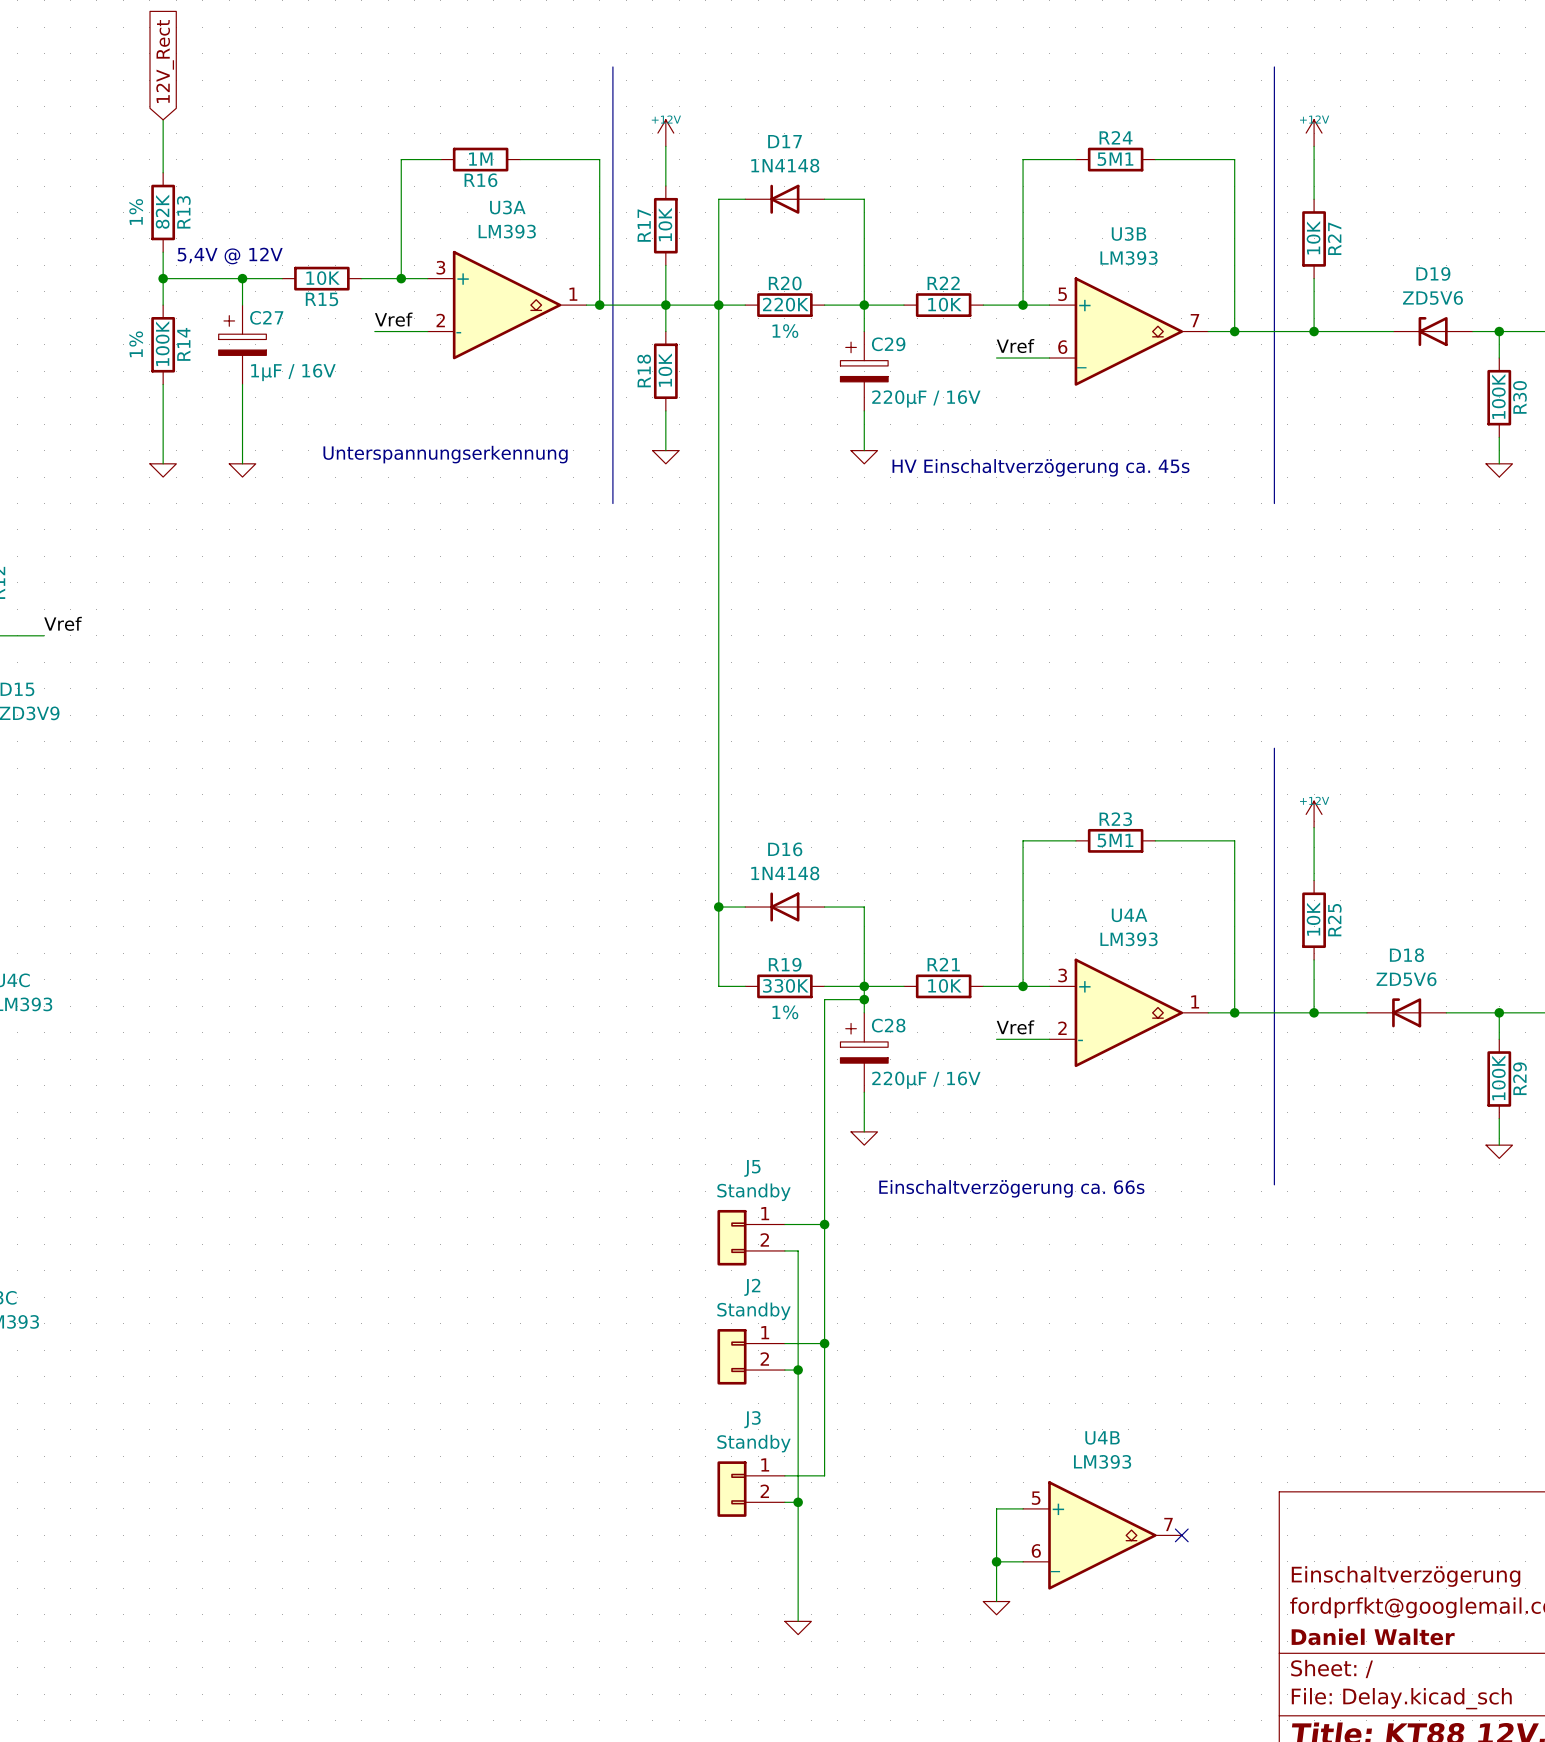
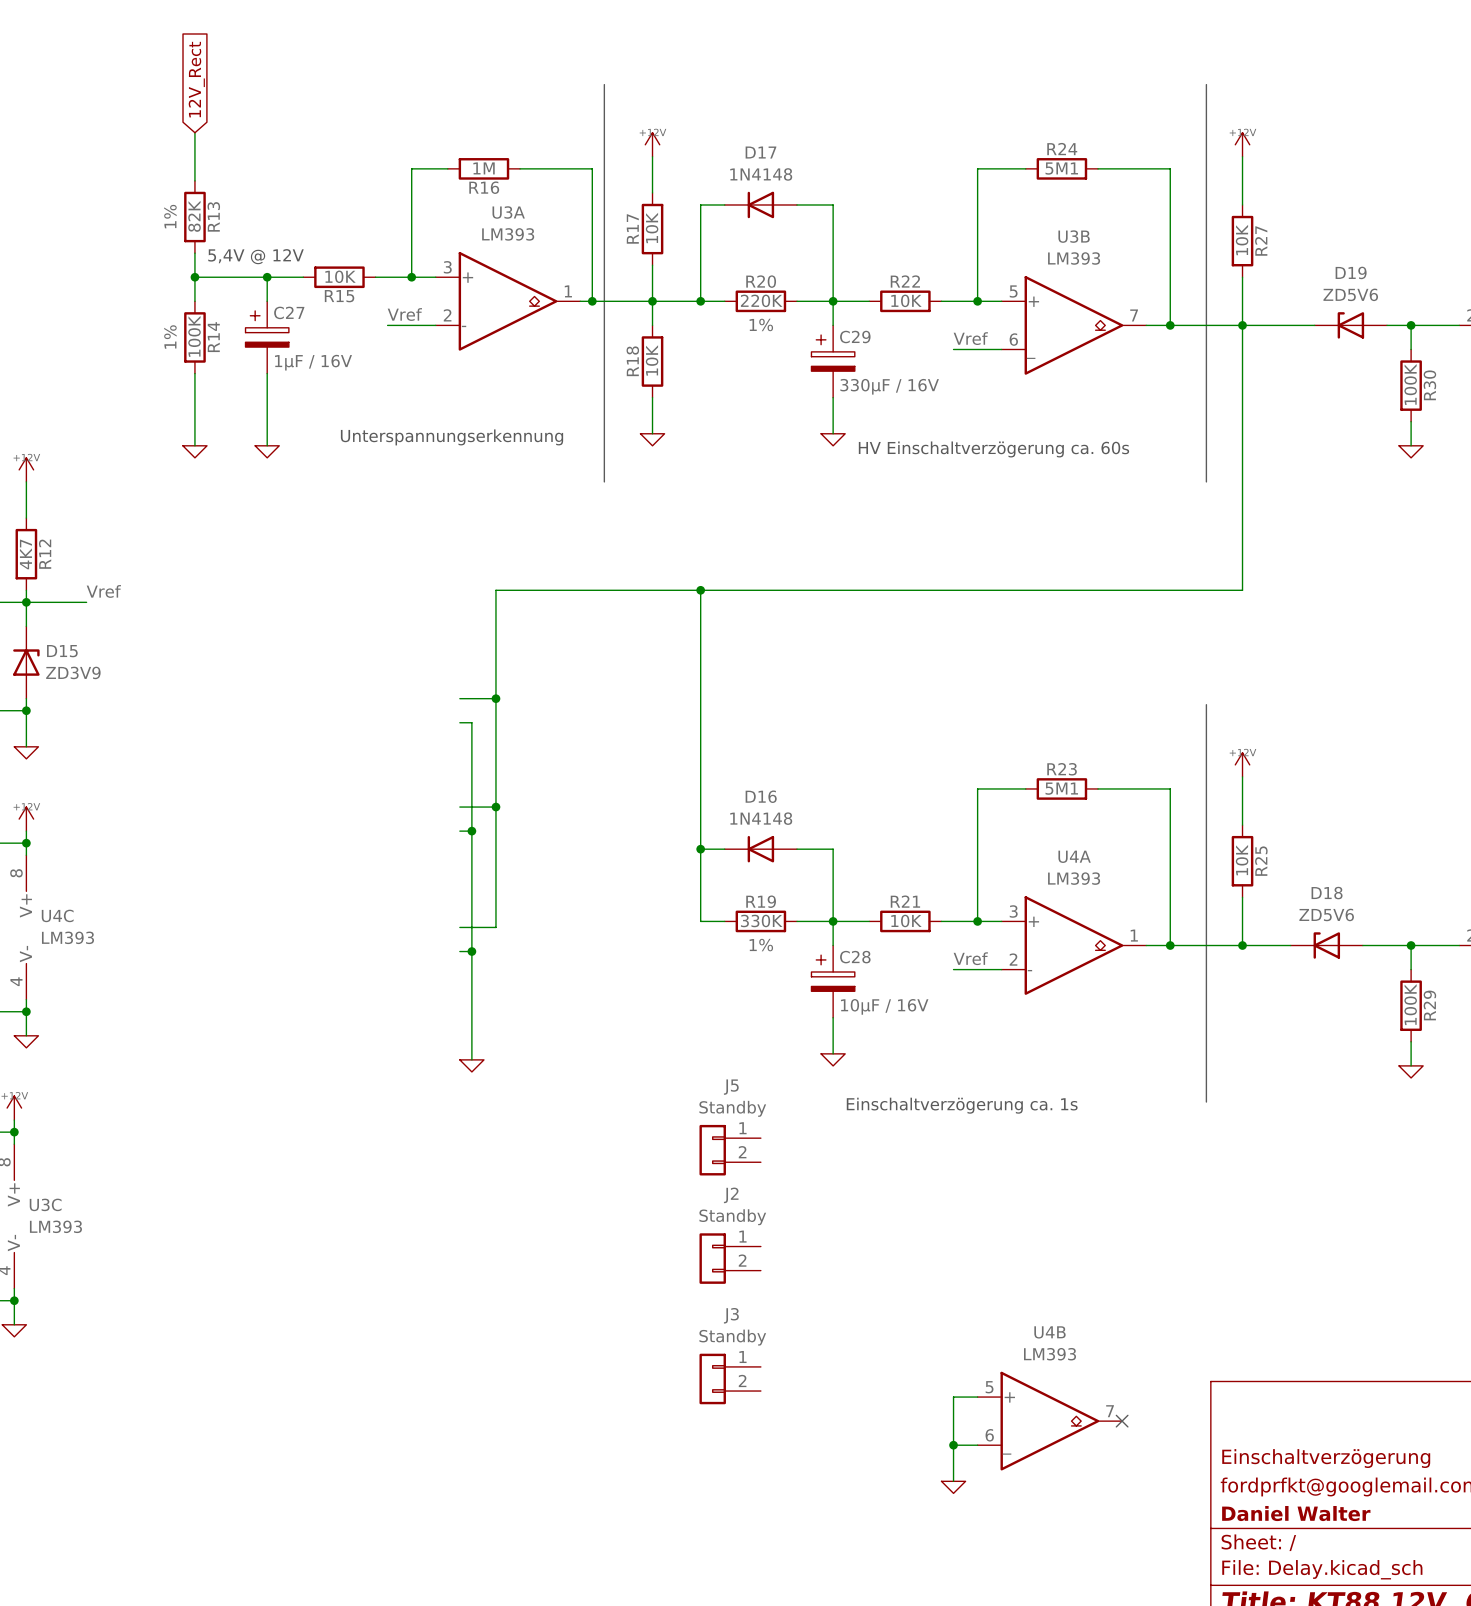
wire: (718, 305) (718, 622) -> none
wire: none -> (1242, 325) (1242, 590) (495, 590) (495, 927) (459, 927)
C29 value: 220µF / 16V (926, 398) -> 330µF / 16V (889, 386)
text: HV Einschaltverzögerung ca. 45s (1041, 467) -> HV Einschaltverzögerung ca. 60s (993, 449)
junction: none -> (700, 590)
wire: none -> (459, 698) (495, 698)
junction: none -> (495, 698)
wire: none -> (459, 722) (471, 722) (471, 1059)
wire: none -> (459, 807) (495, 807)
junction: none -> (495, 807)
wire: none -> (459, 831) (471, 831)
junction: none -> (471, 831)
wire: (864, 999) (824, 999) (824, 1475) (784, 1475) -> none
junction: (864, 999) -> none
wire: none -> (459, 951) (471, 951)
junction: none -> (471, 951)
C28 value: 220µF / 16V (926, 1080) -> 10µF / 16V (884, 1006)
power symbol: none -> (471, 1065)
text: Einschaltverzögerung ca. 66s (1011, 1188) -> Einschaltverzögerung ca. 1s (962, 1105)
wire: (784, 1224) (824, 1224) -> none
junction: (824, 1224) -> none
wire: (784, 1250) (798, 1250) (798, 1621) -> none
wire: (784, 1343) (824, 1343) -> none
junction: (824, 1343) -> none
wire: (784, 1370) (798, 1370) -> none
junction: (798, 1370) -> none
wire: (784, 1502) (798, 1502) -> none
junction: (798, 1502) -> none
power symbol: (798, 1627) -> none

